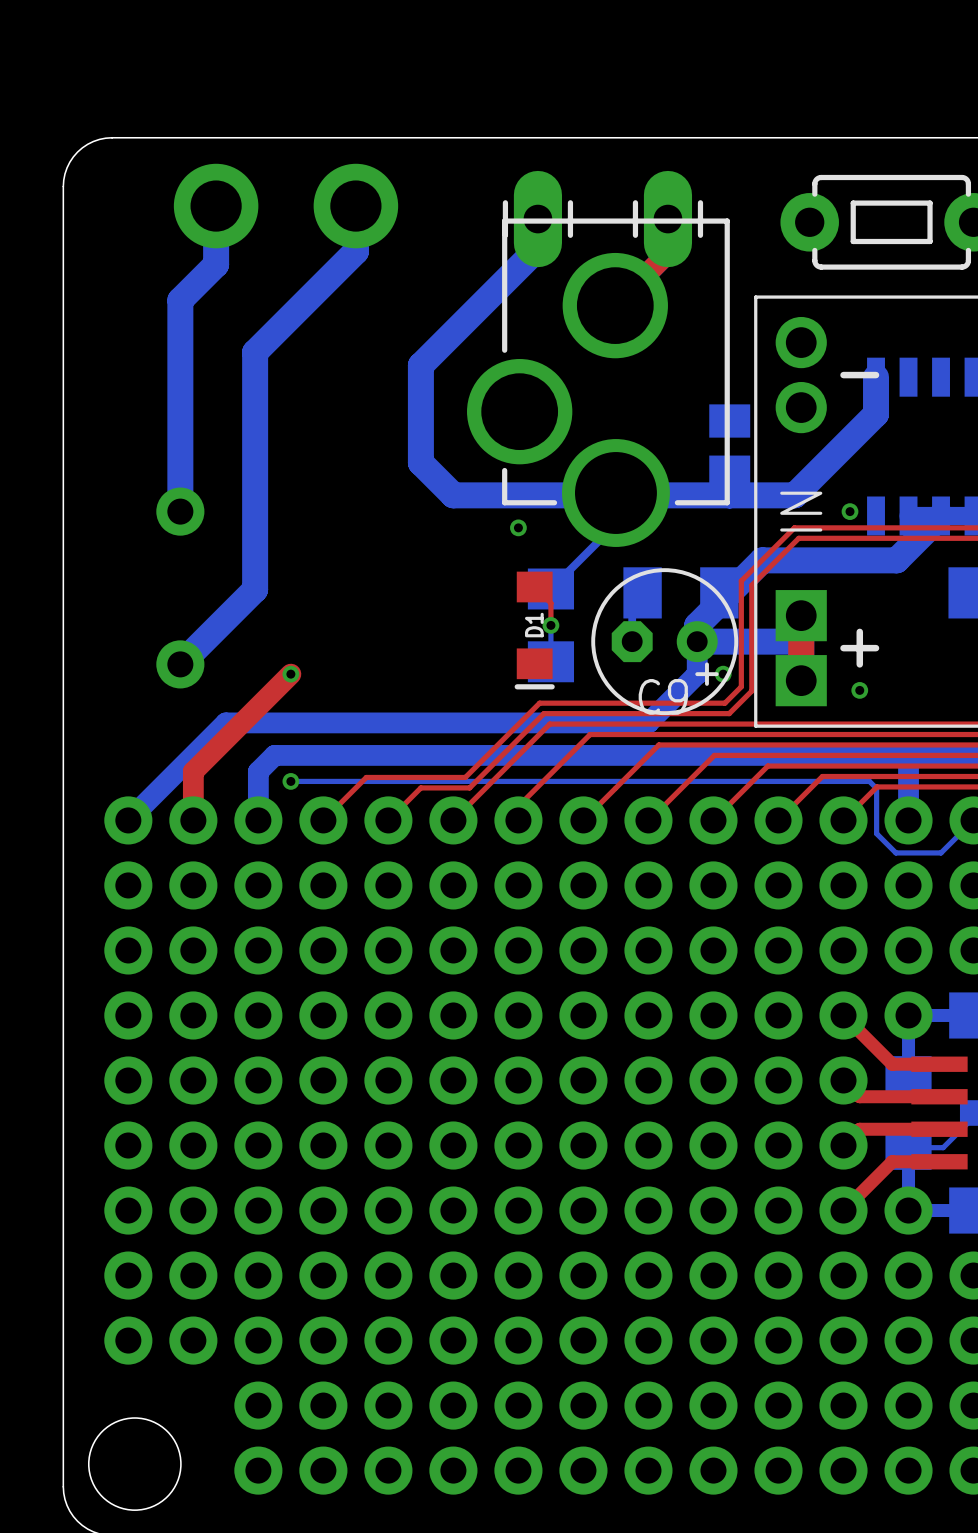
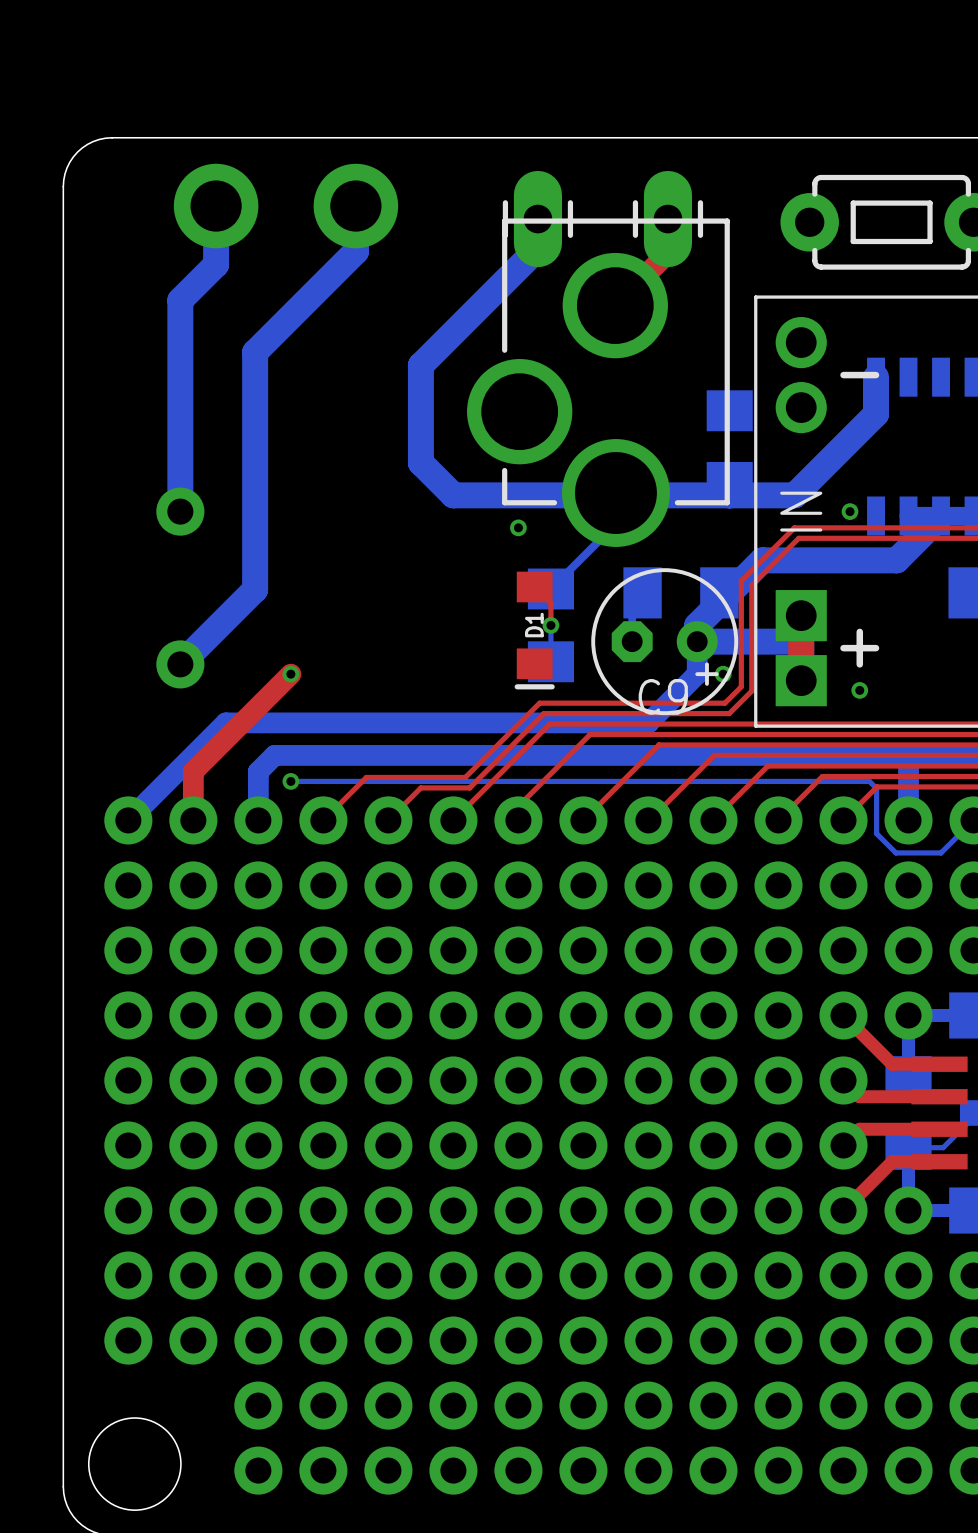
part footprint: [709, 404, 751, 489] -> [706, 390, 753, 503]

